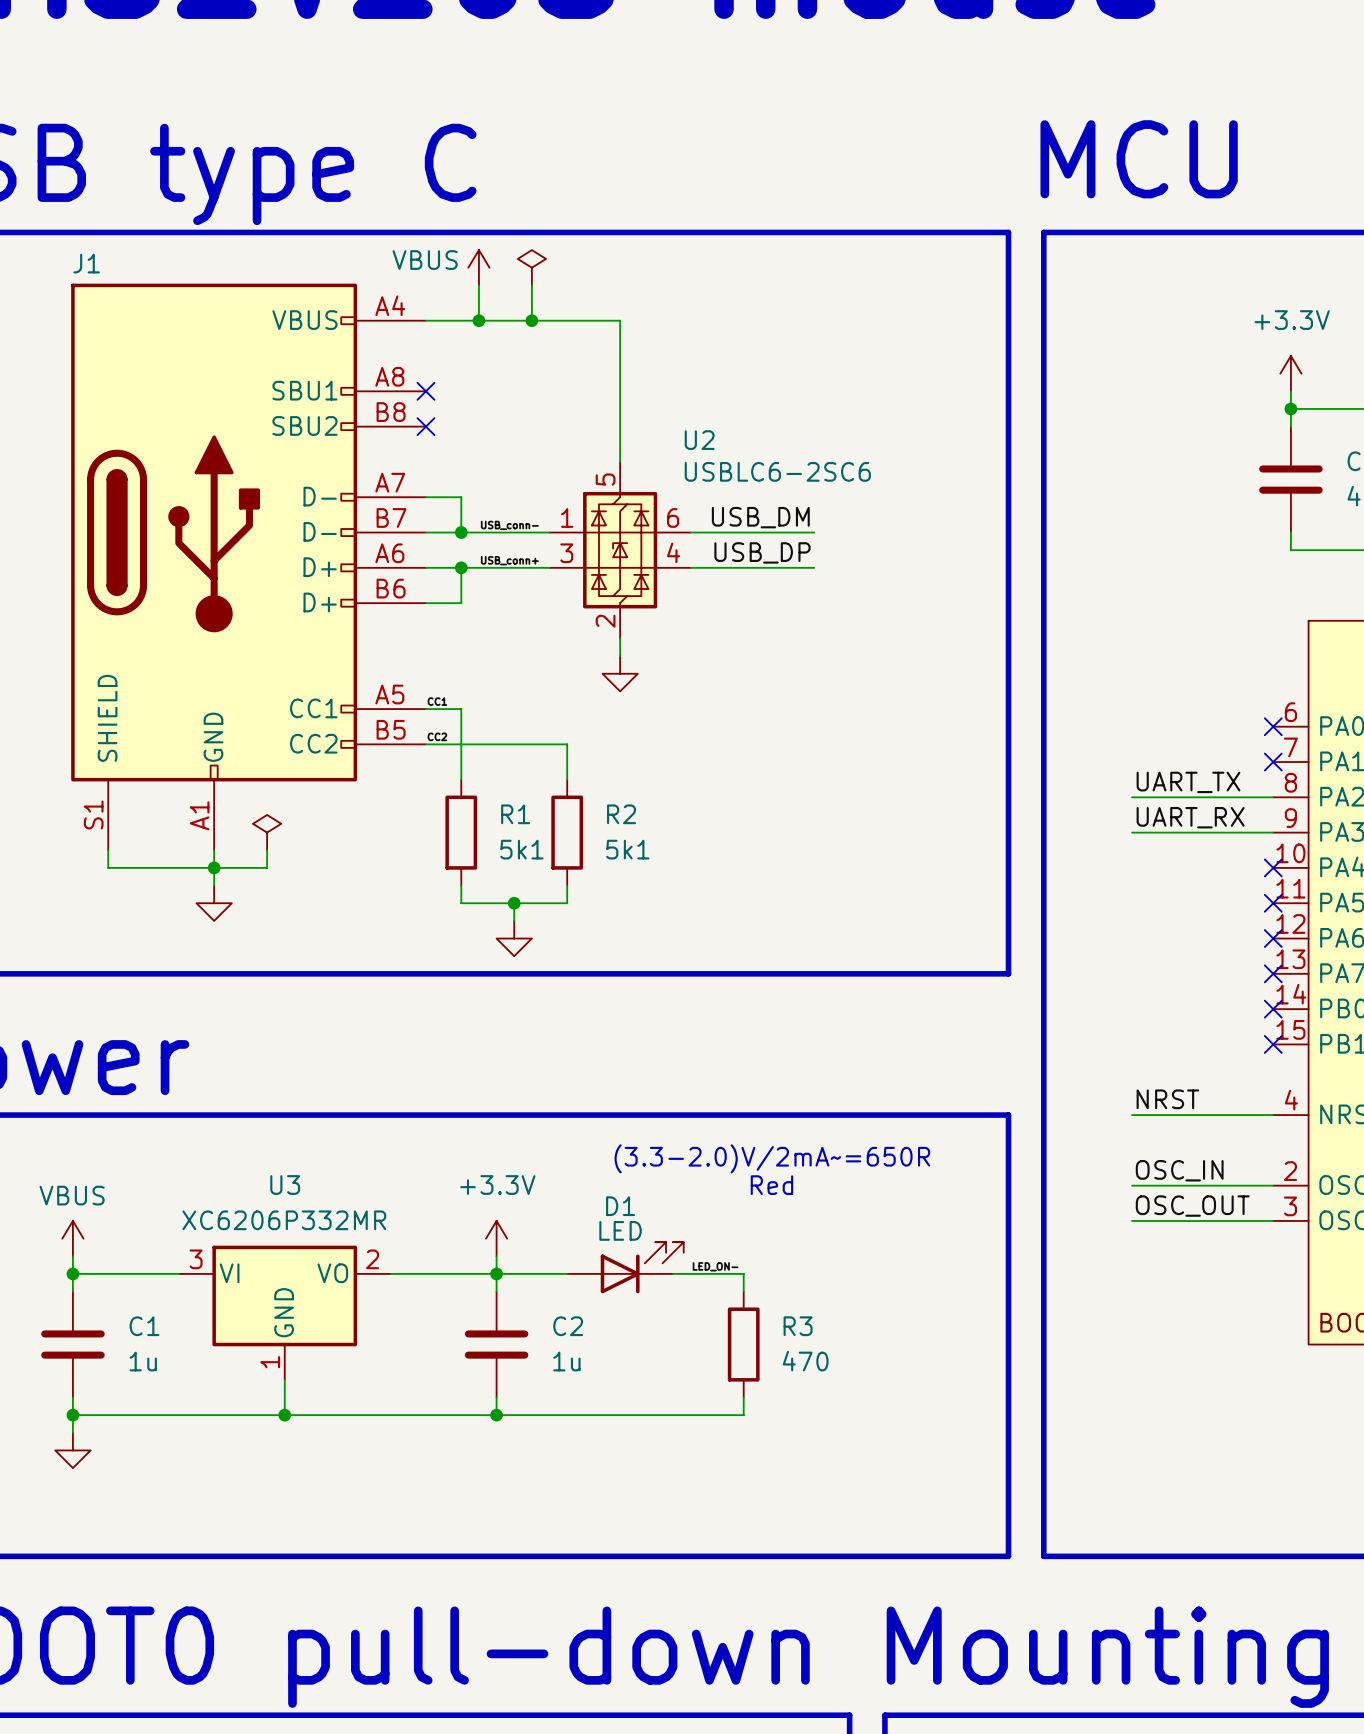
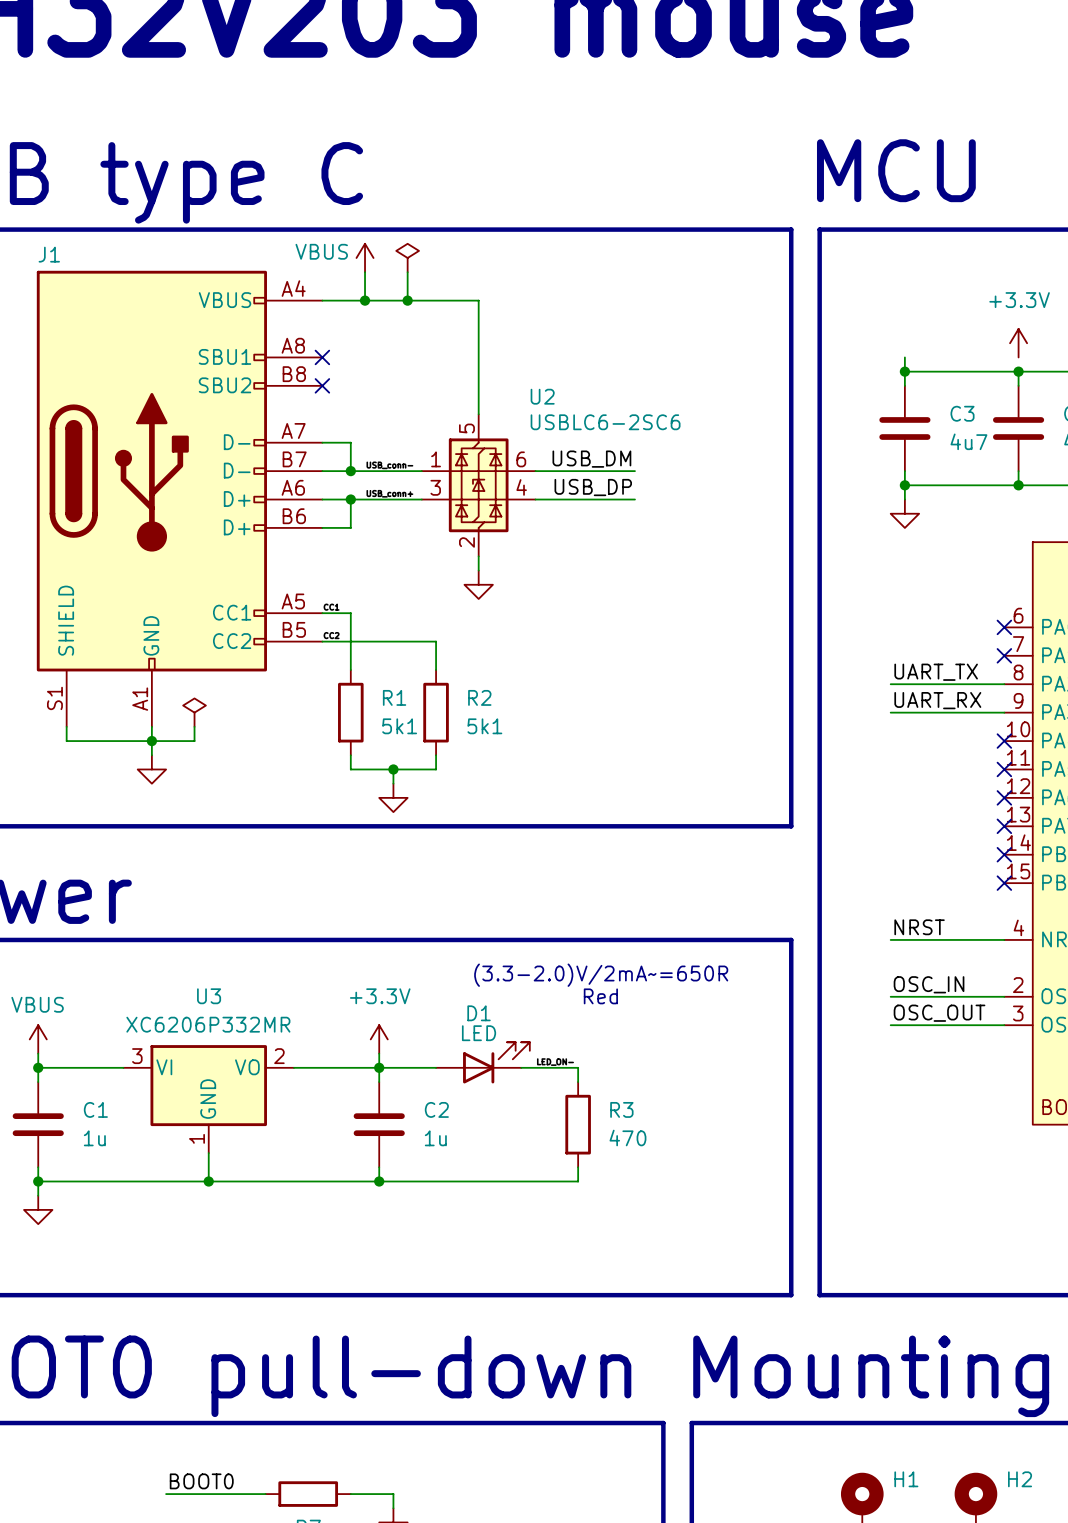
wire: none -> (904, 357) (904, 385)
wire: (1290, 391) (1290, 408) -> (904, 371) (1018, 371)
junction: none -> (904, 371)
C3: none -> 4u7 (904, 428)
wire: none -> (904, 471) (904, 499)
wire: none -> (904, 485) (1018, 485)
junction: none -> (904, 485)
junction: none -> (1018, 485)
power symbol: none -> (904, 513)

